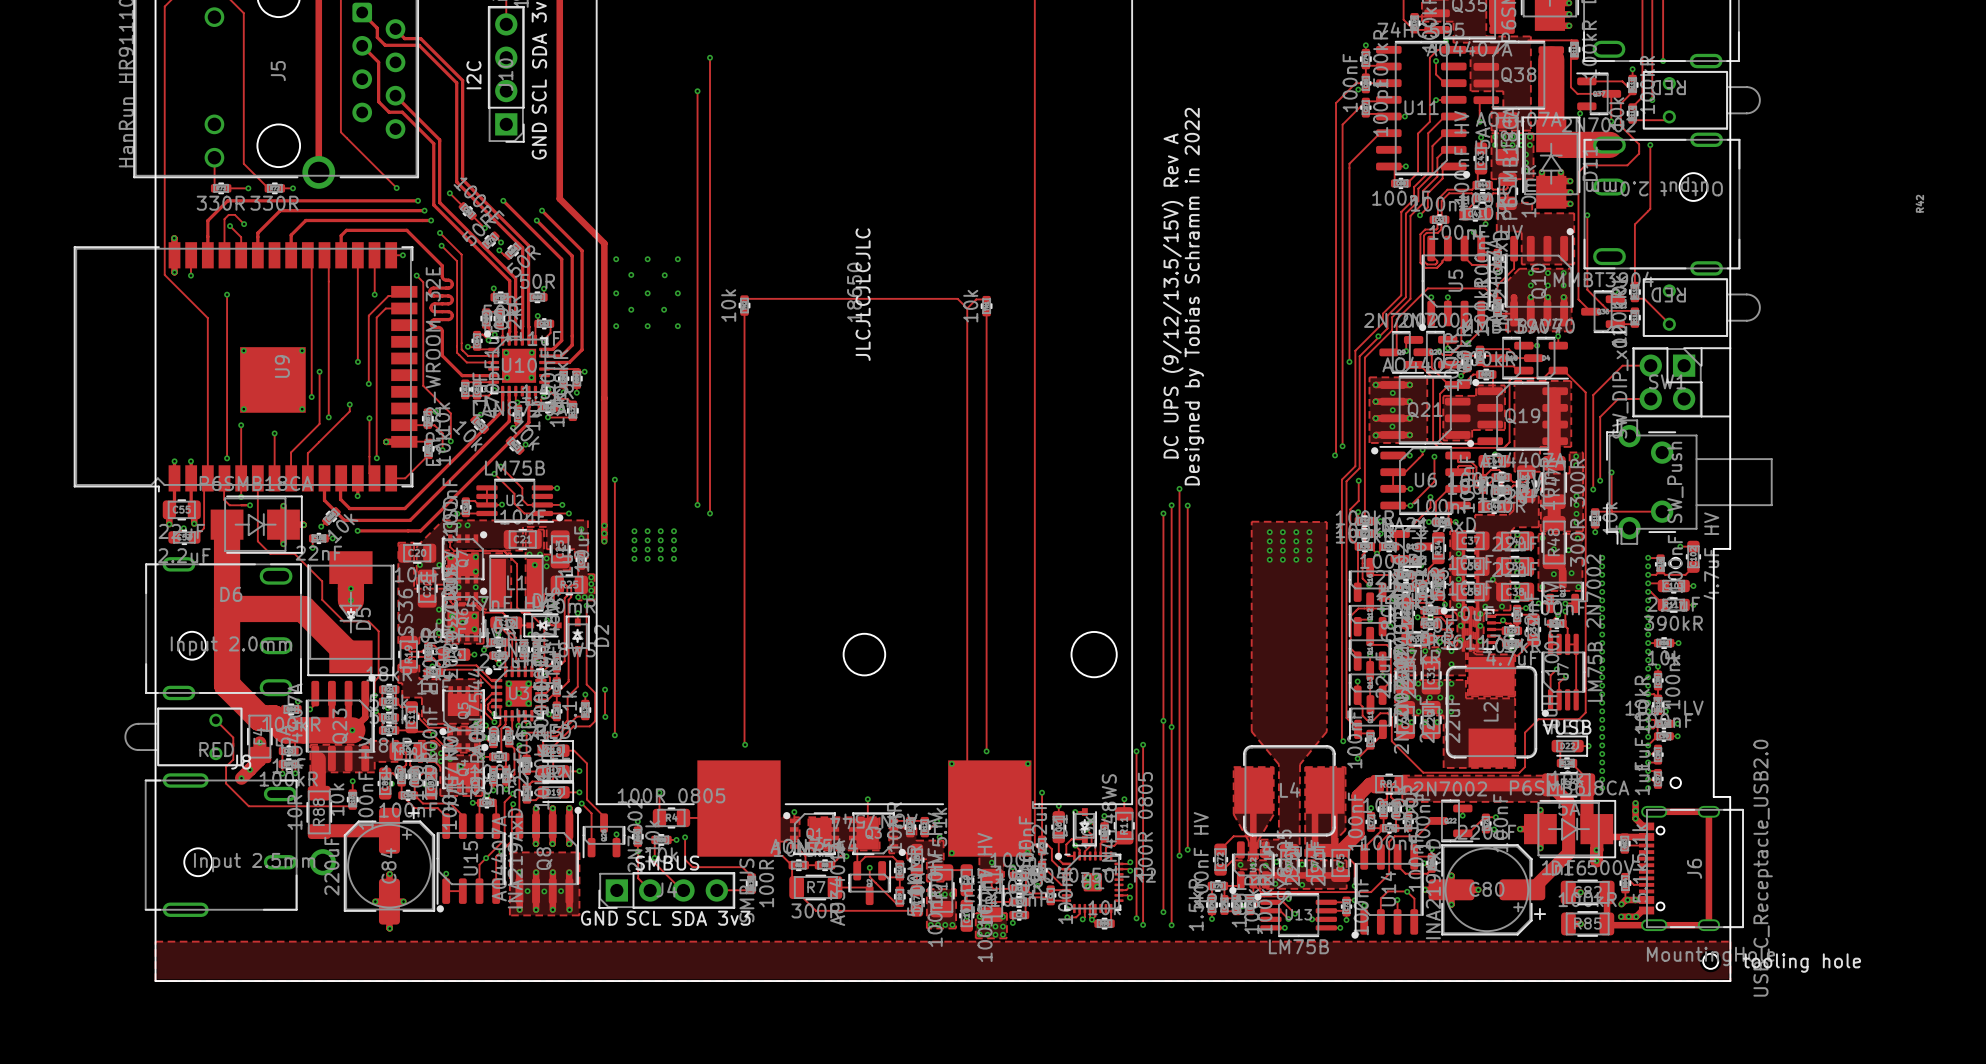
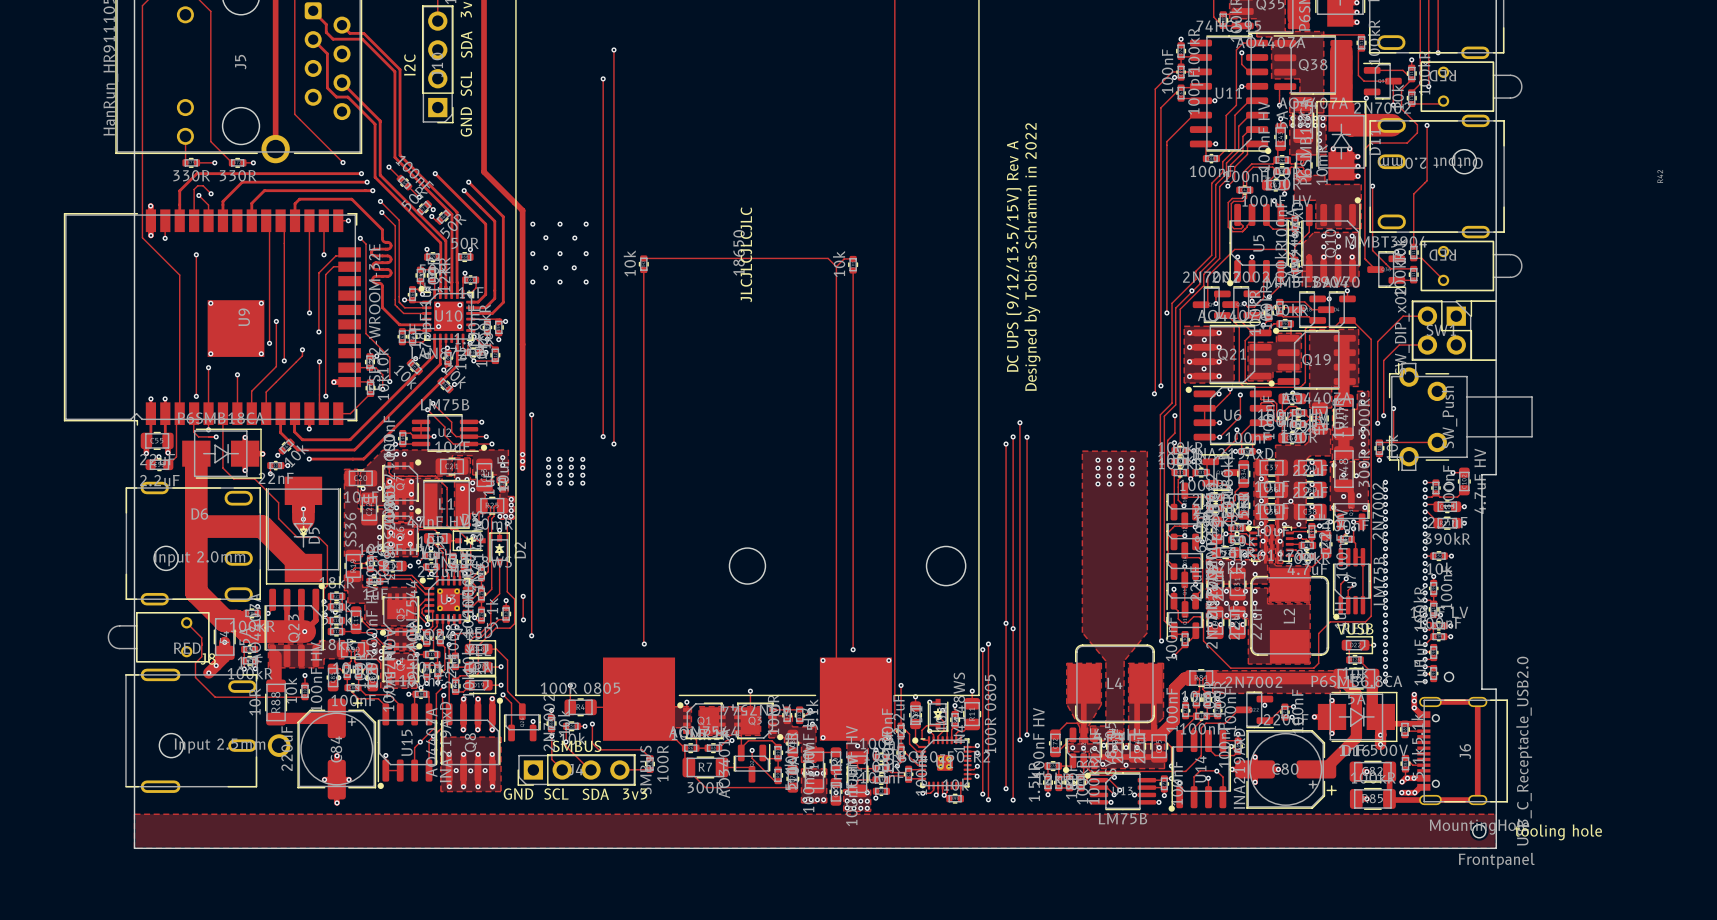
drawing: none -> [1458, 852, 1535, 869]

